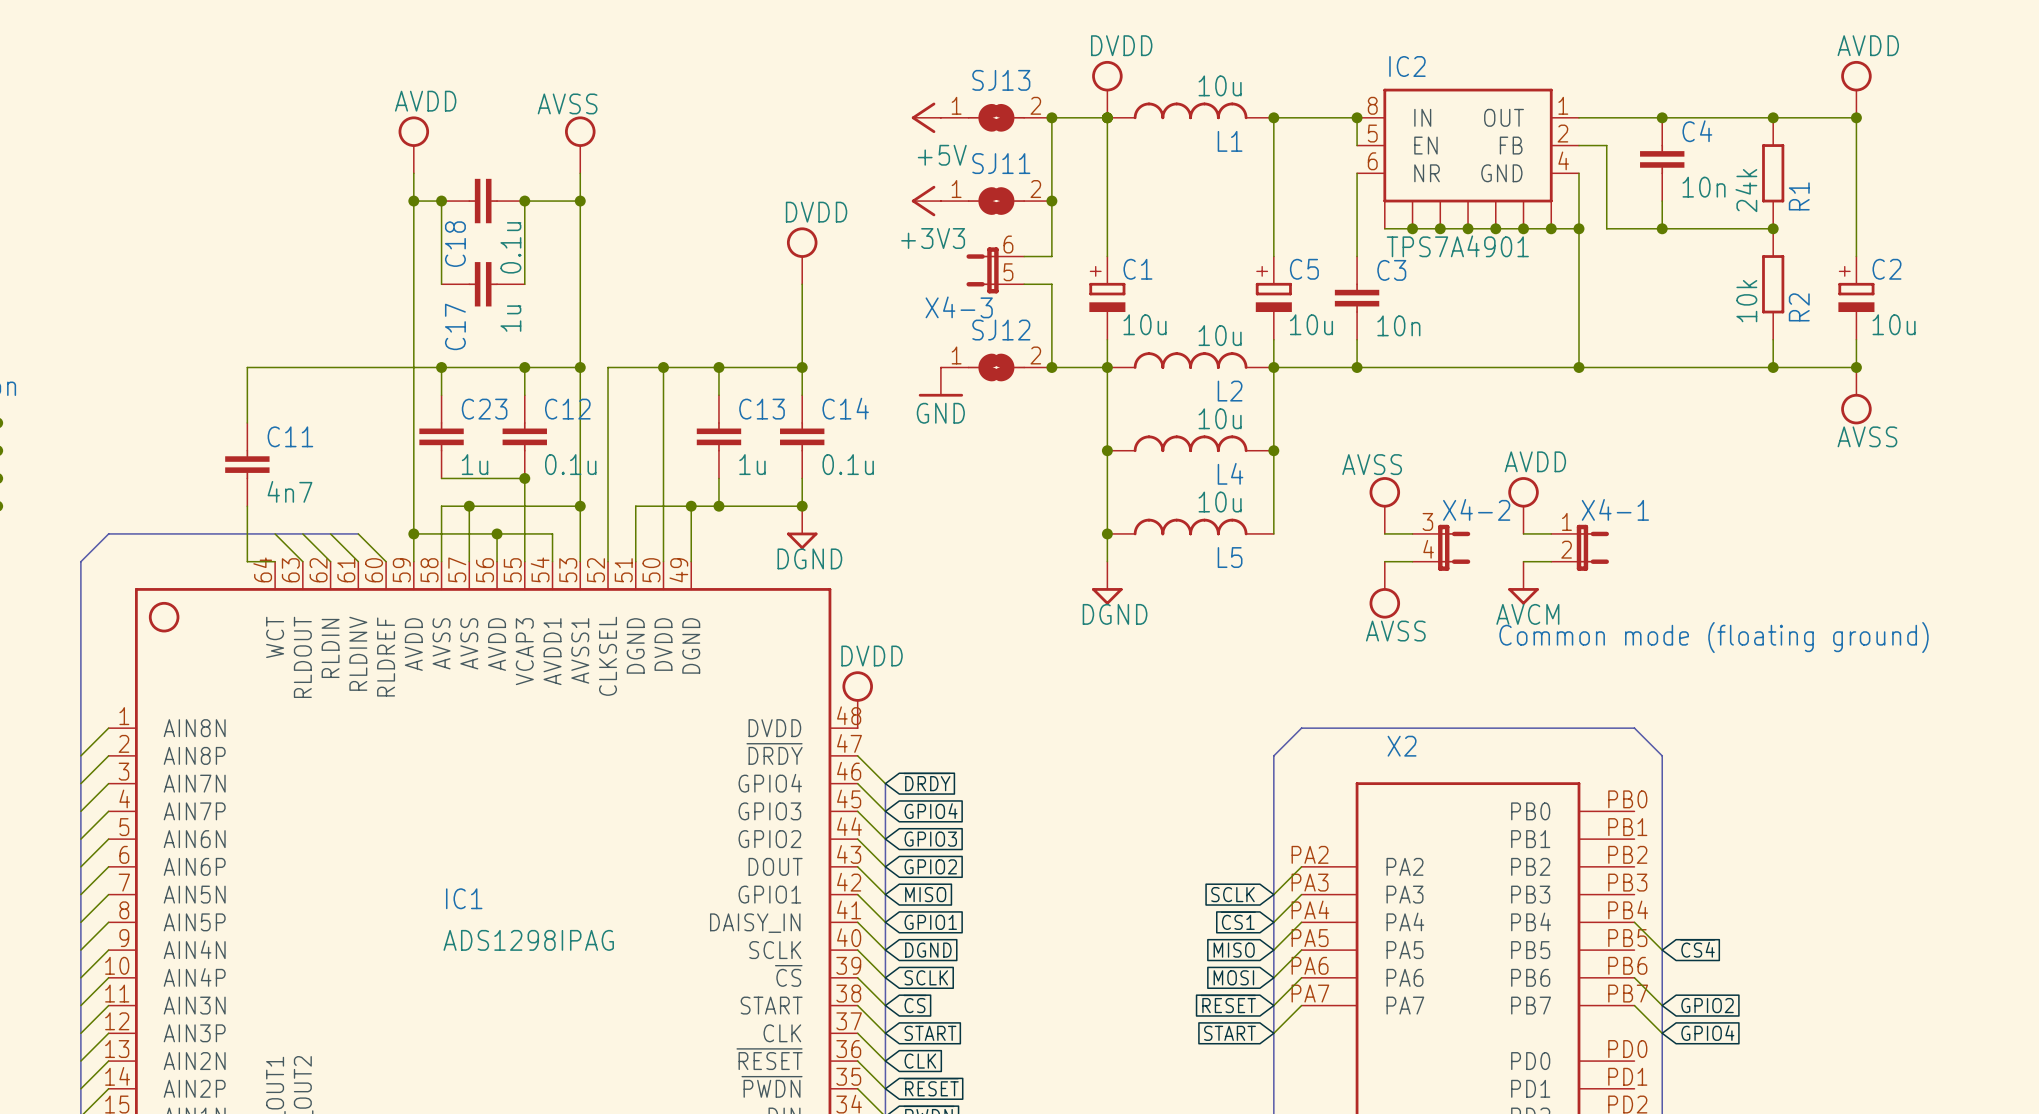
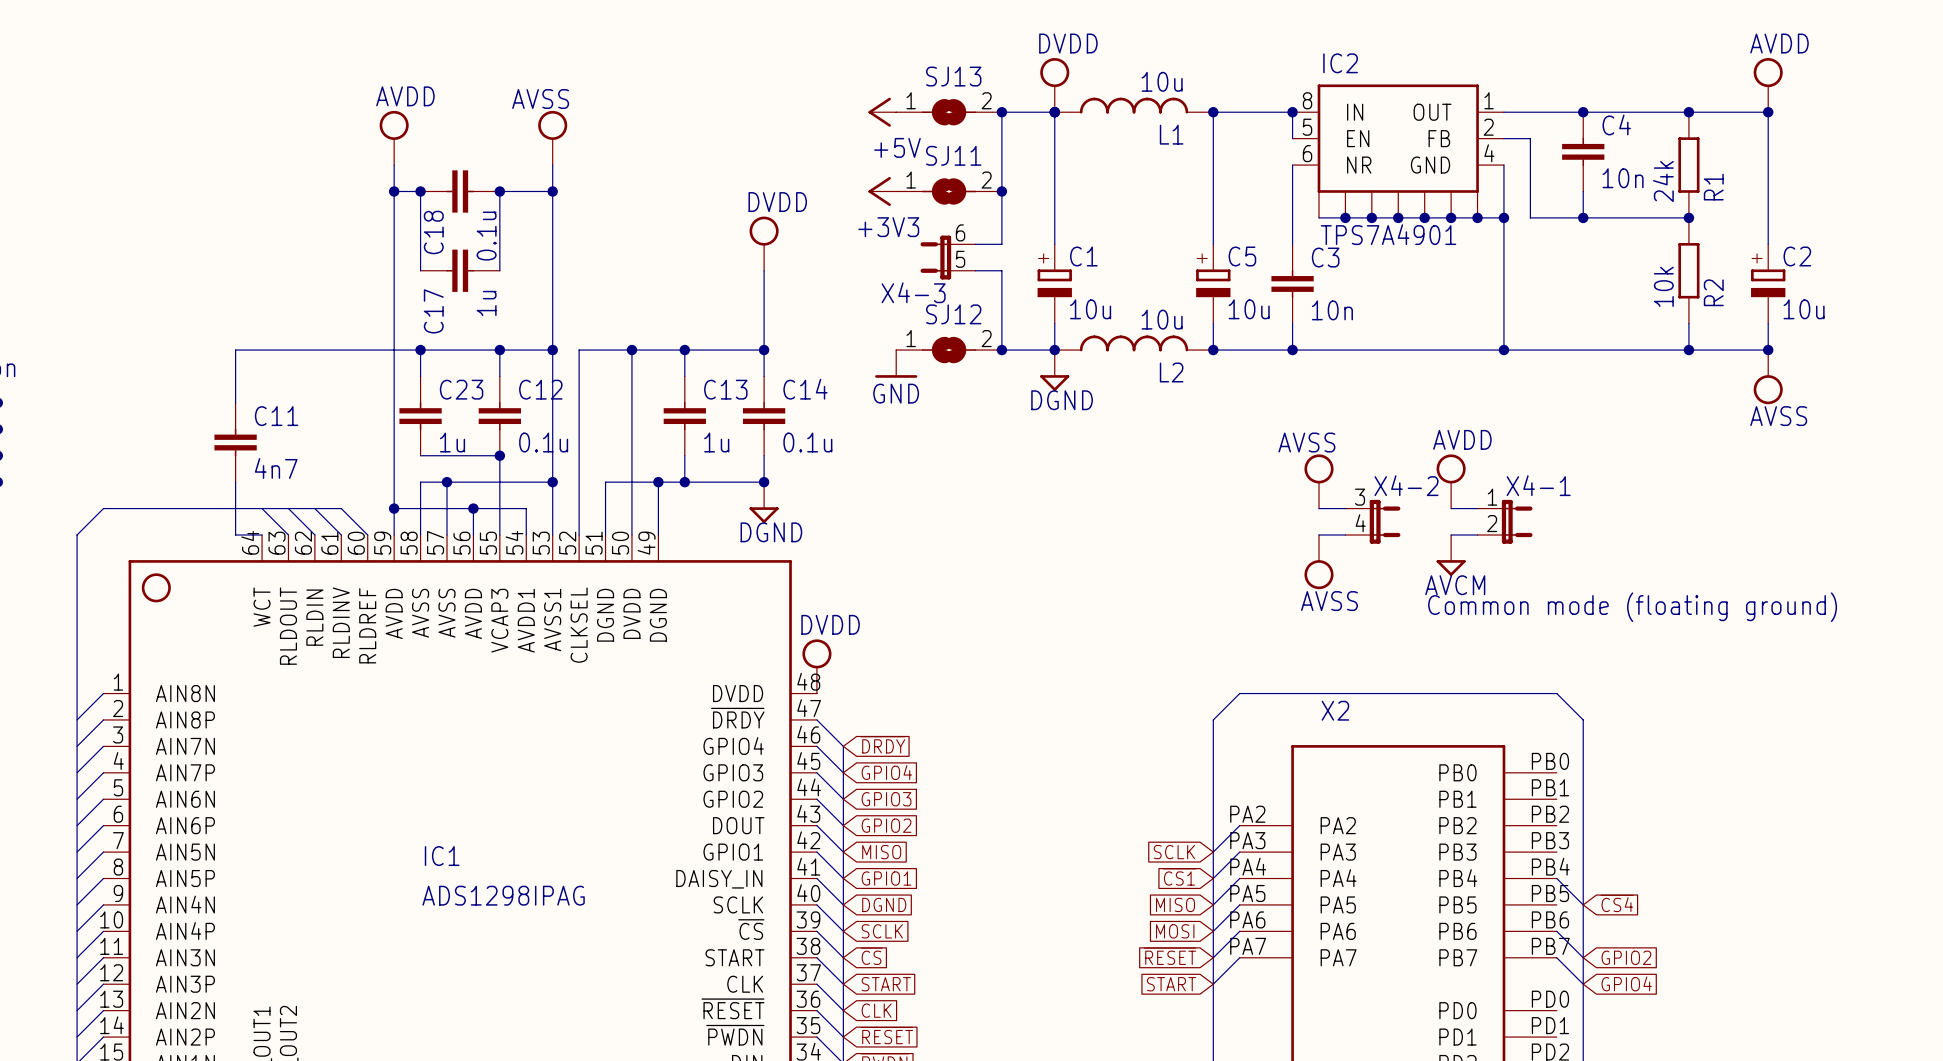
wire: (1107, 367) (1107, 561) -> none
wire: (1273, 367) (1273, 533) -> none
L4: 10u (1190, 443) -> none
junction: (1107, 450) -> none
junction: (1273, 450) -> none
L5: 10u (1190, 527) -> none
junction: (1107, 533) -> none
power symbol position: DGND (1107, 583) -> DGND (1054, 370)

